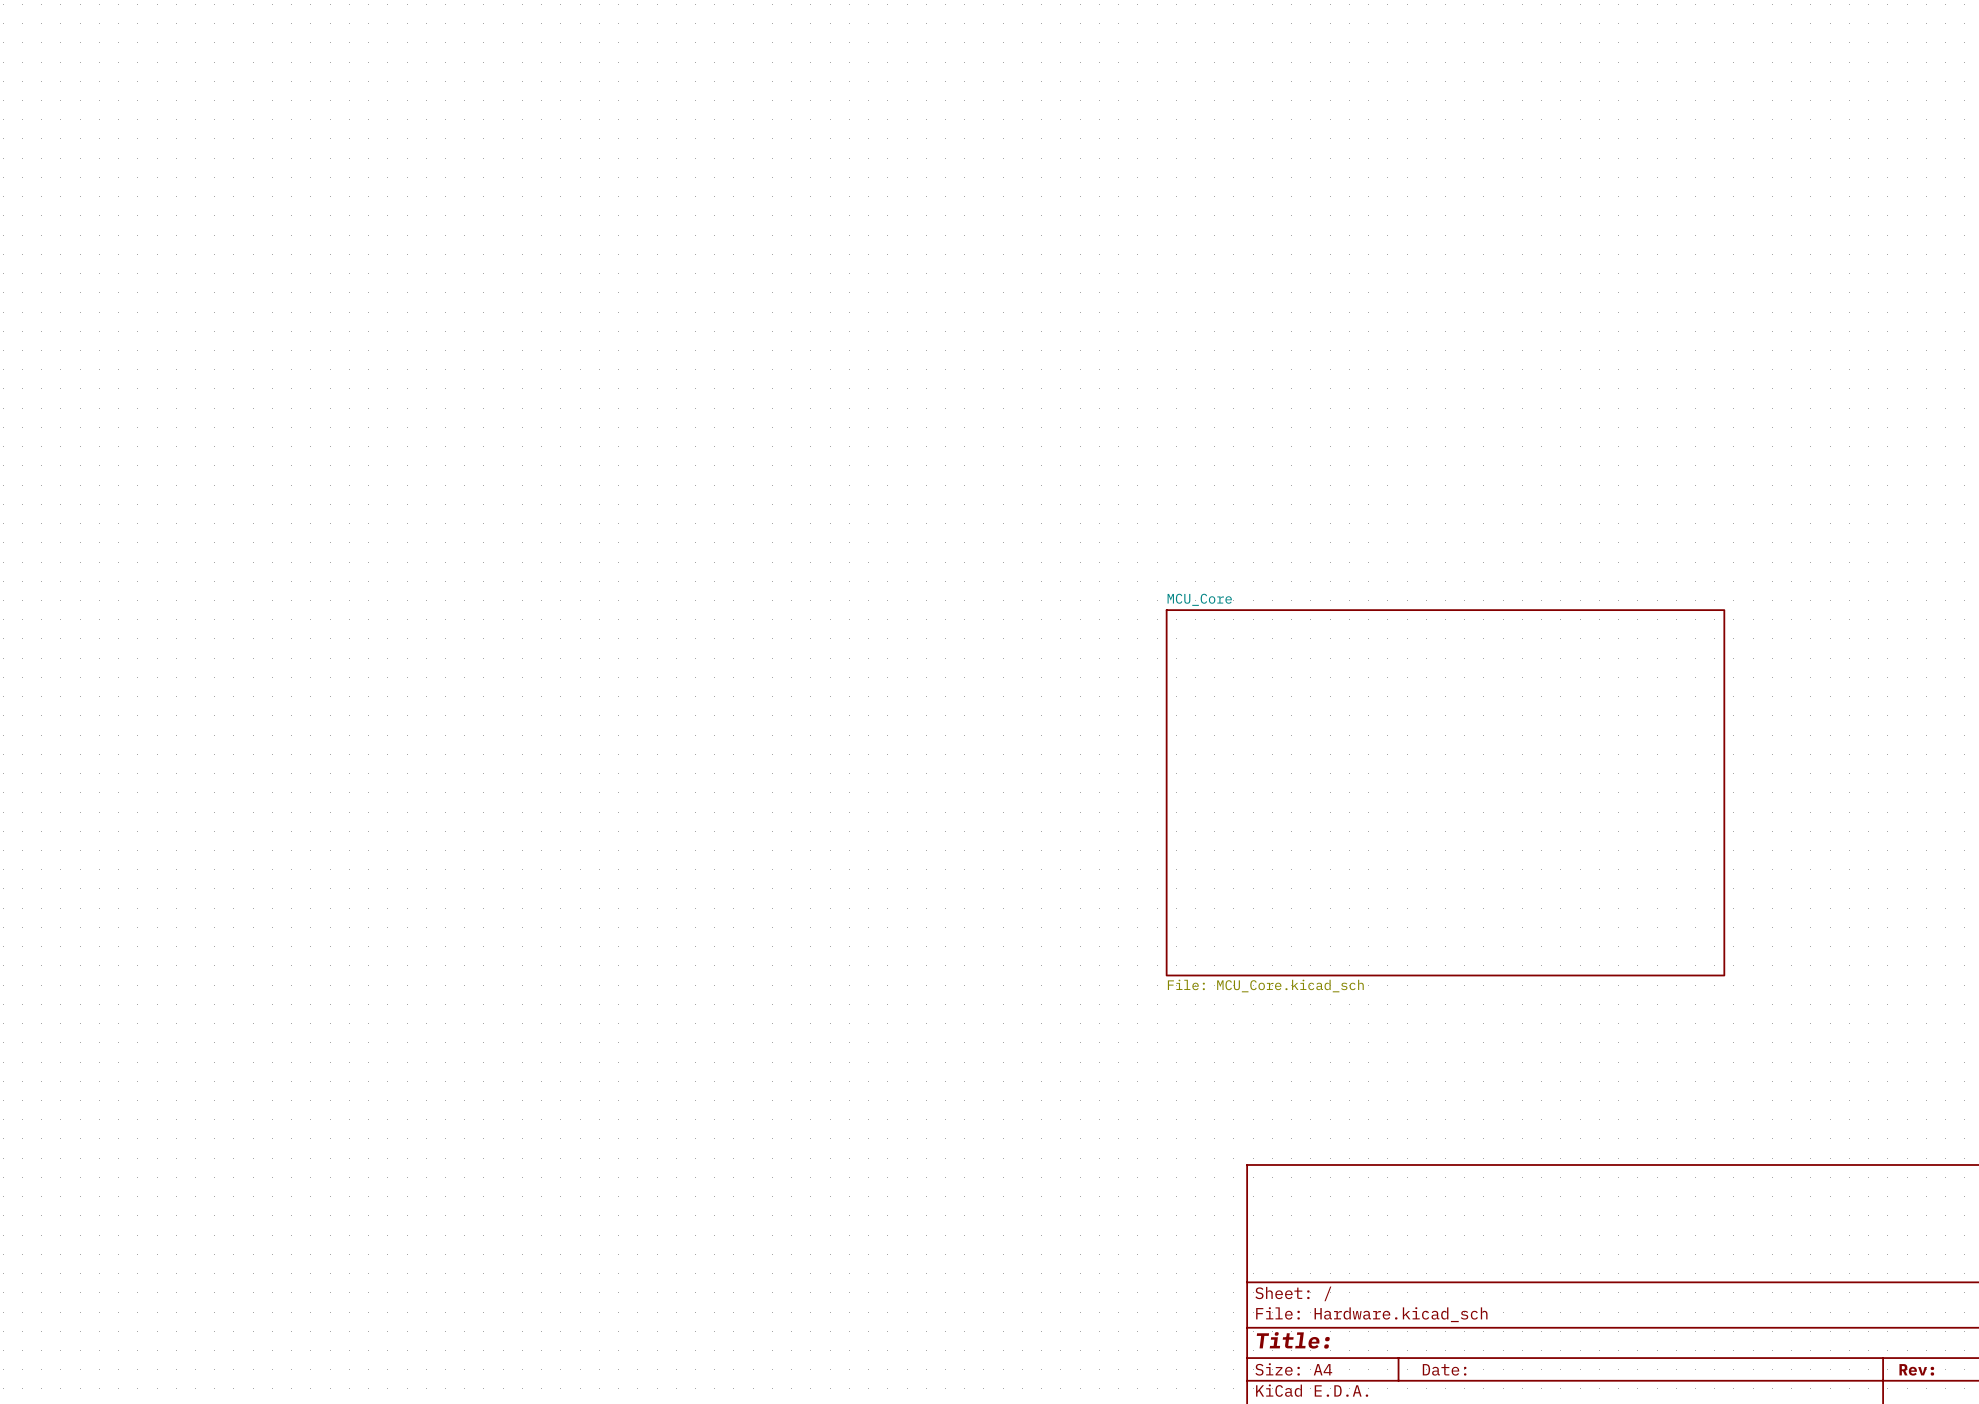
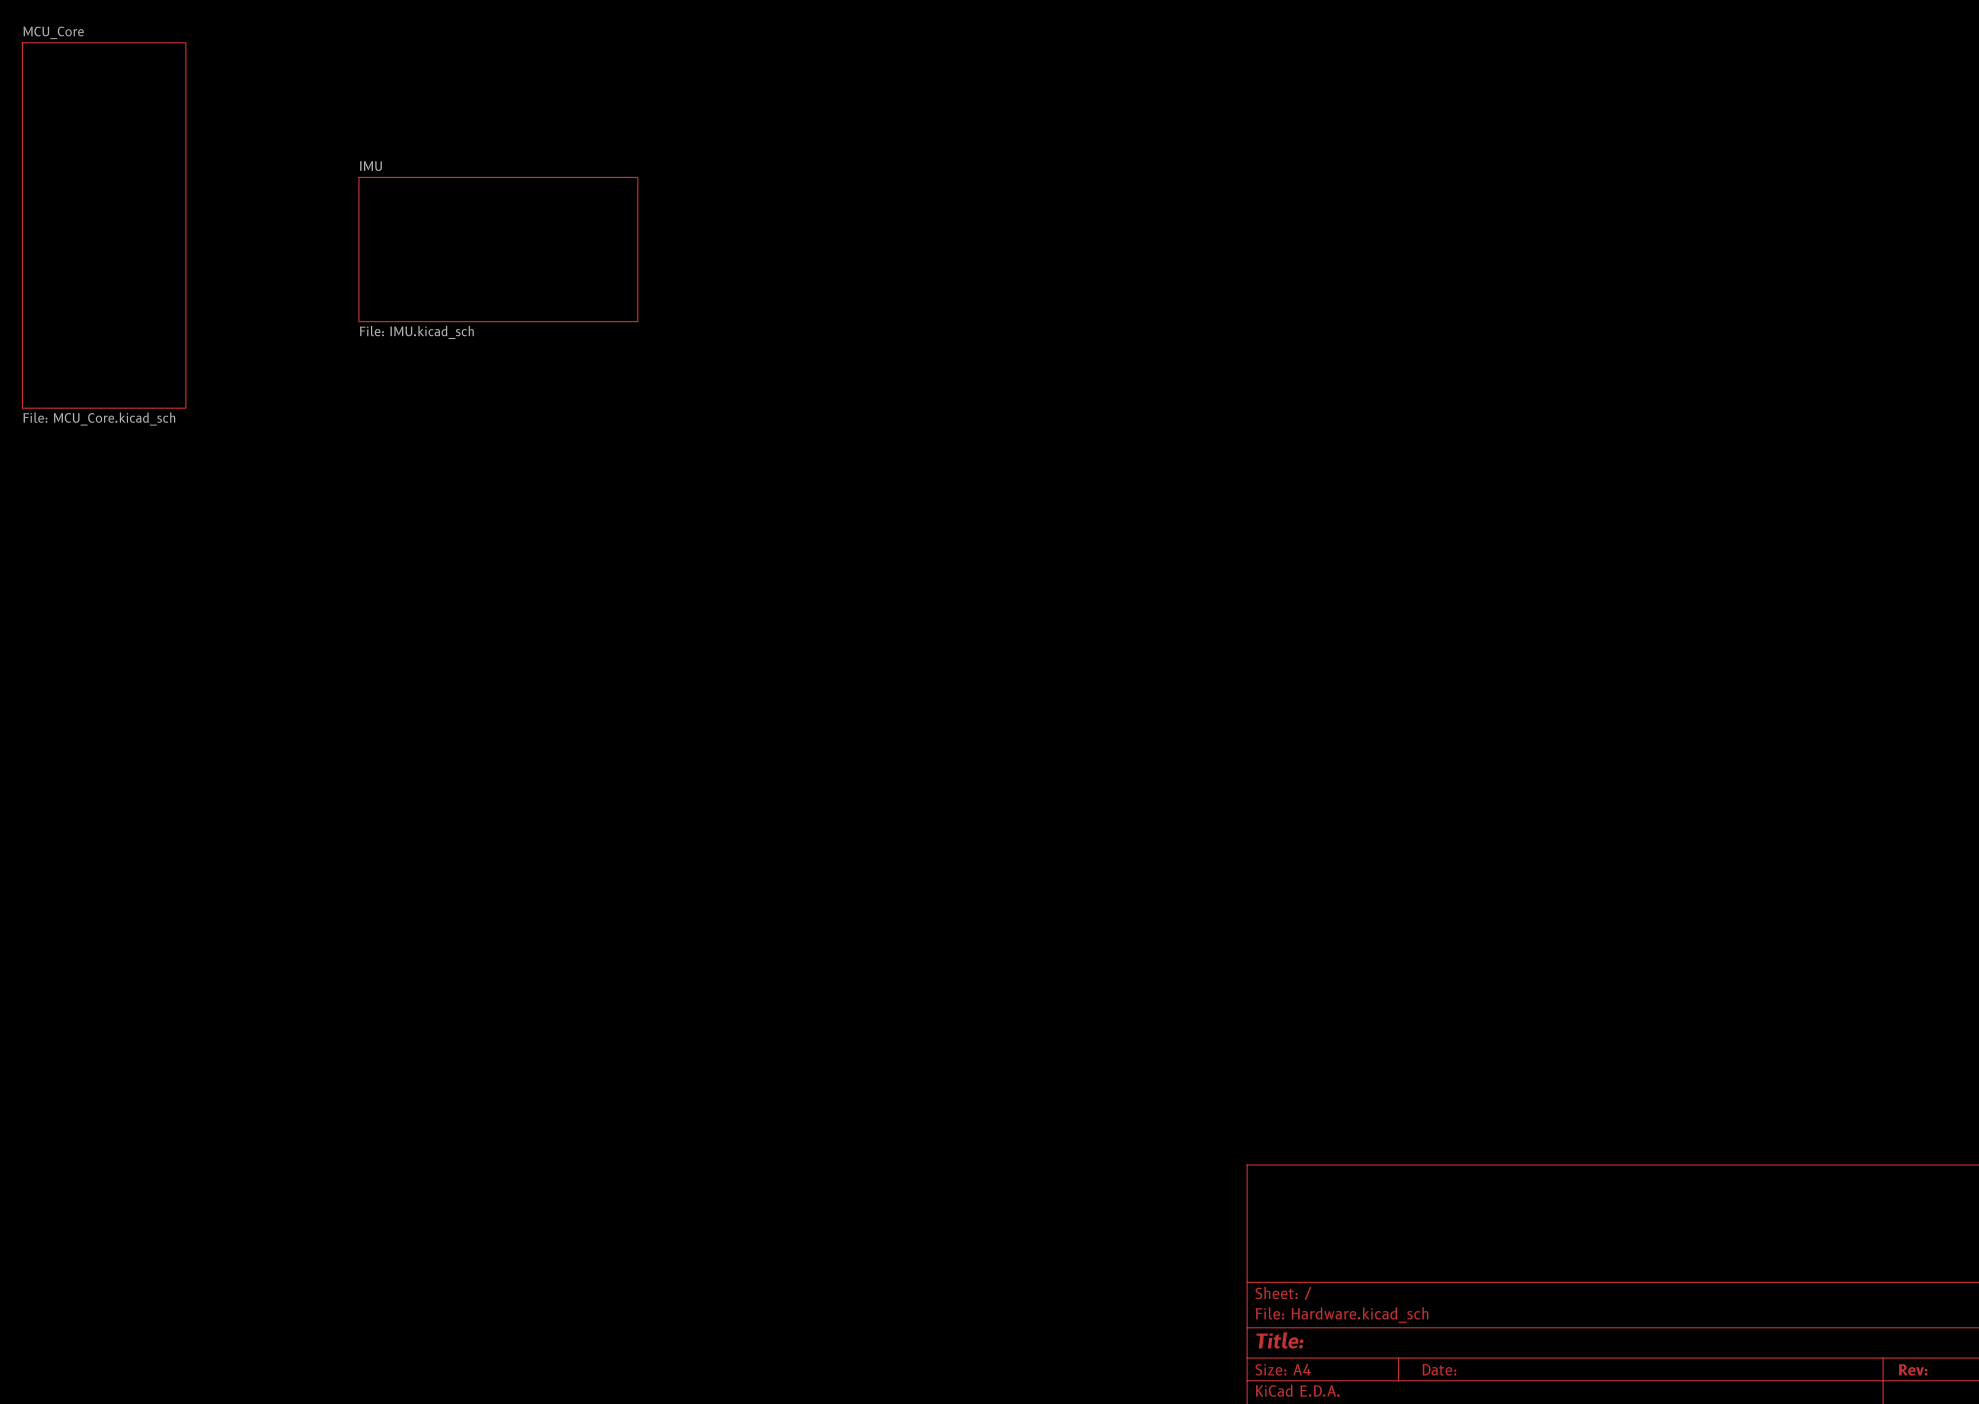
sheet MCU_Core: none -> File: MCU_Core.kicad_sch (104, 225)
sheet IMU: none -> File: IMU.kicad_sch (498, 249)
sheet MCU_Core: File: MCU_Core.kicad_sch (1445, 792) -> none

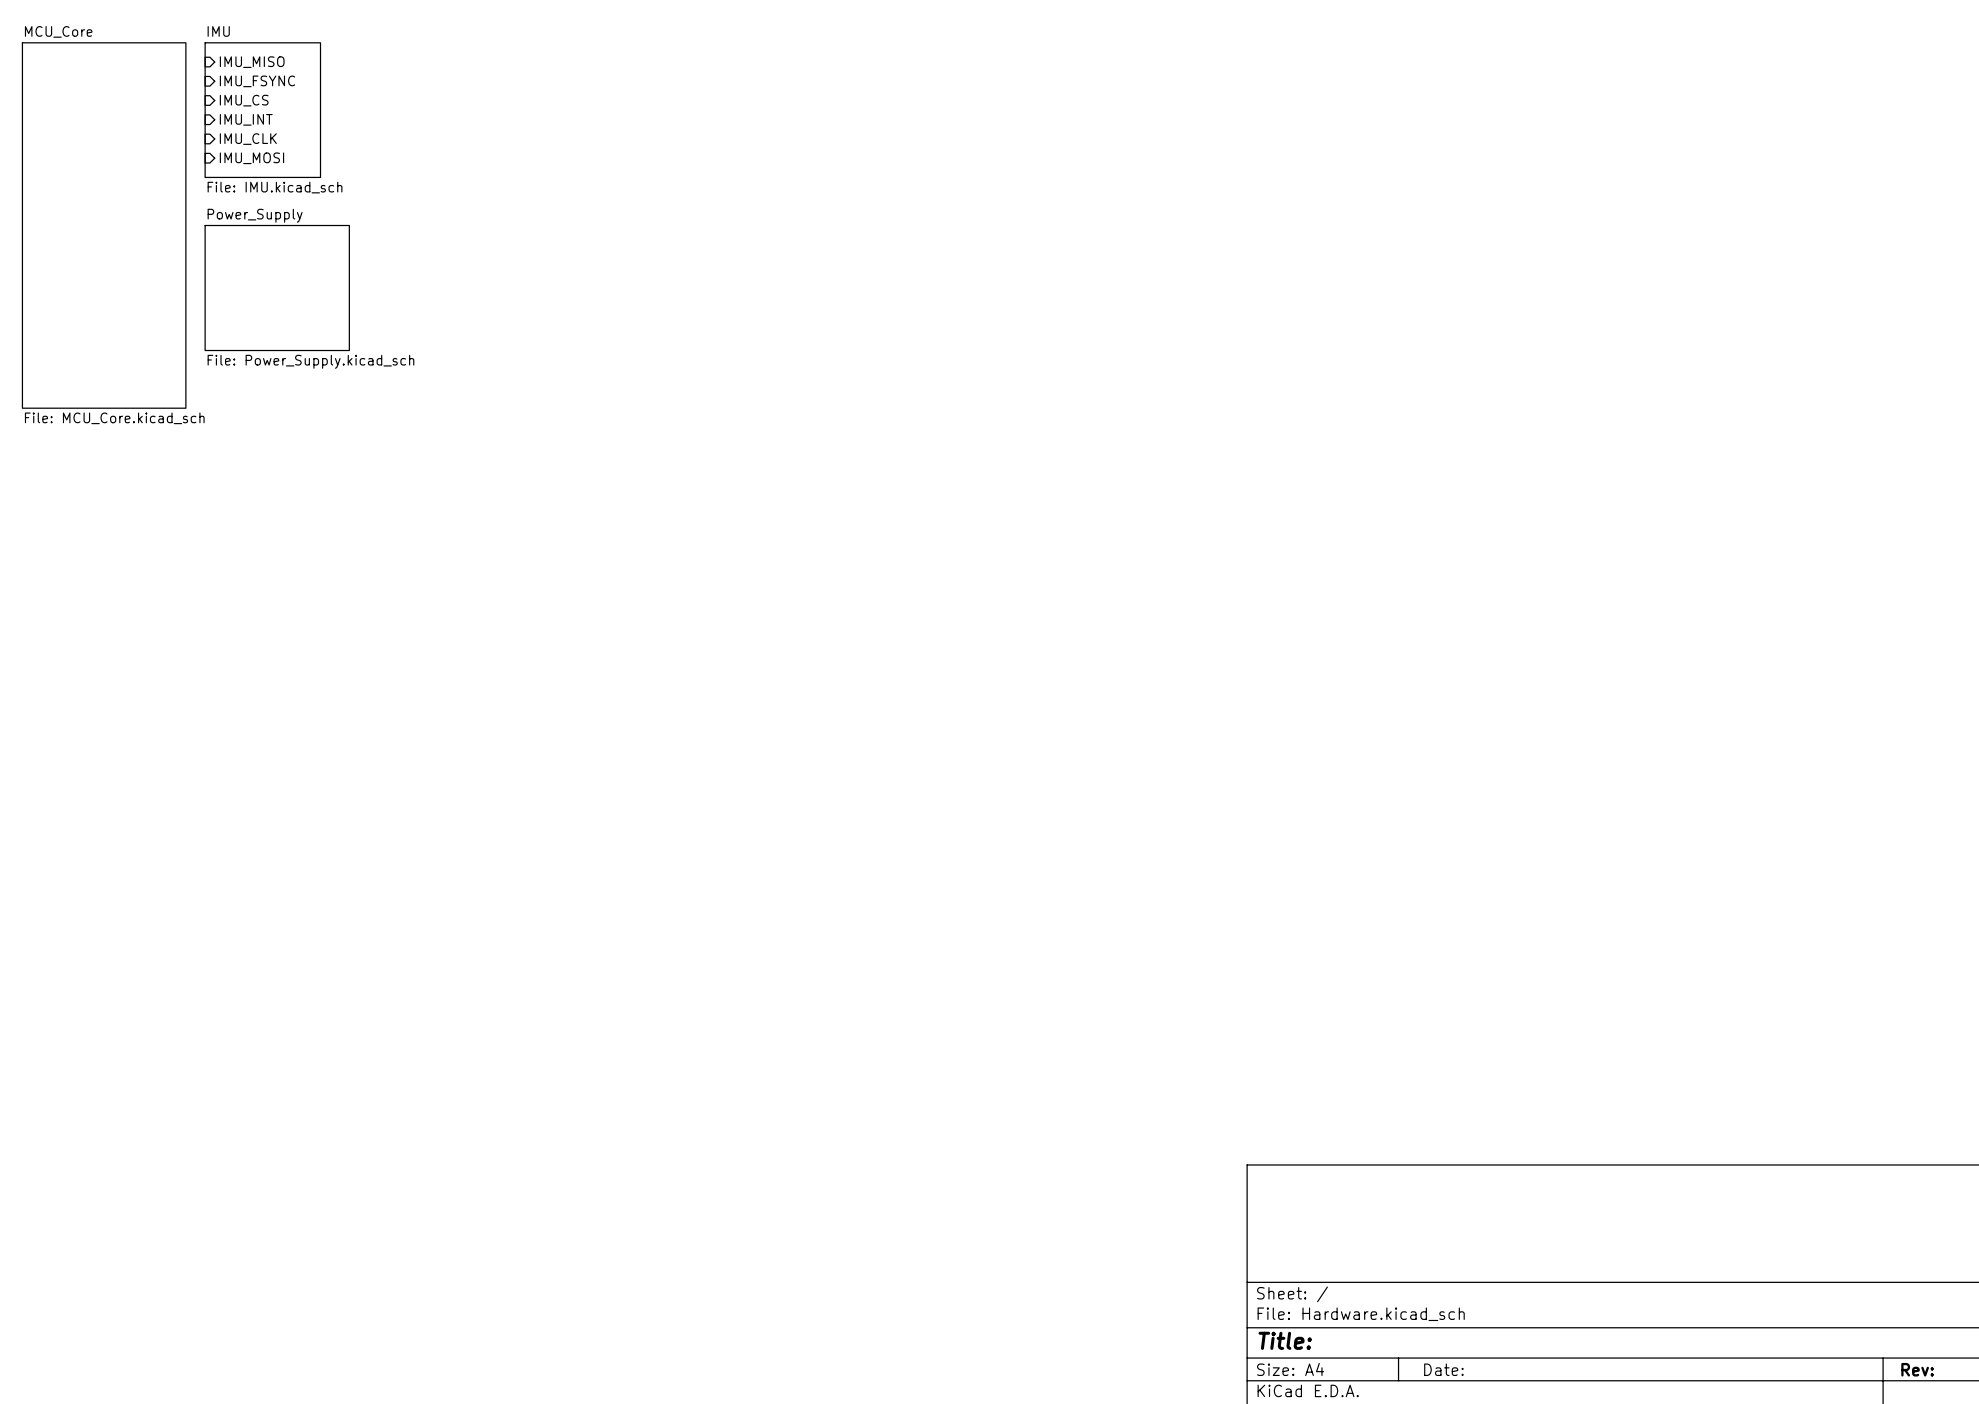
sheet pin: none -> IMU_MISO (252, 62)
sheet pin: none -> IMU_FSYNC (257, 81)
sheet pin: none -> IMU_CS (244, 100)
sheet IMU: none -> File: IMU.kicad_sch (262, 110)
sheet pin: none -> IMU_INT (246, 119)
sheet pin: none -> IMU_CLK (248, 139)
sheet pin: none -> IMU_MOSI (251, 158)
sheet IMU: File: IMU.kicad_sch (498, 249) -> none
sheet Power_Supply: none -> File: Power_Supply.kicad_sch (277, 288)

